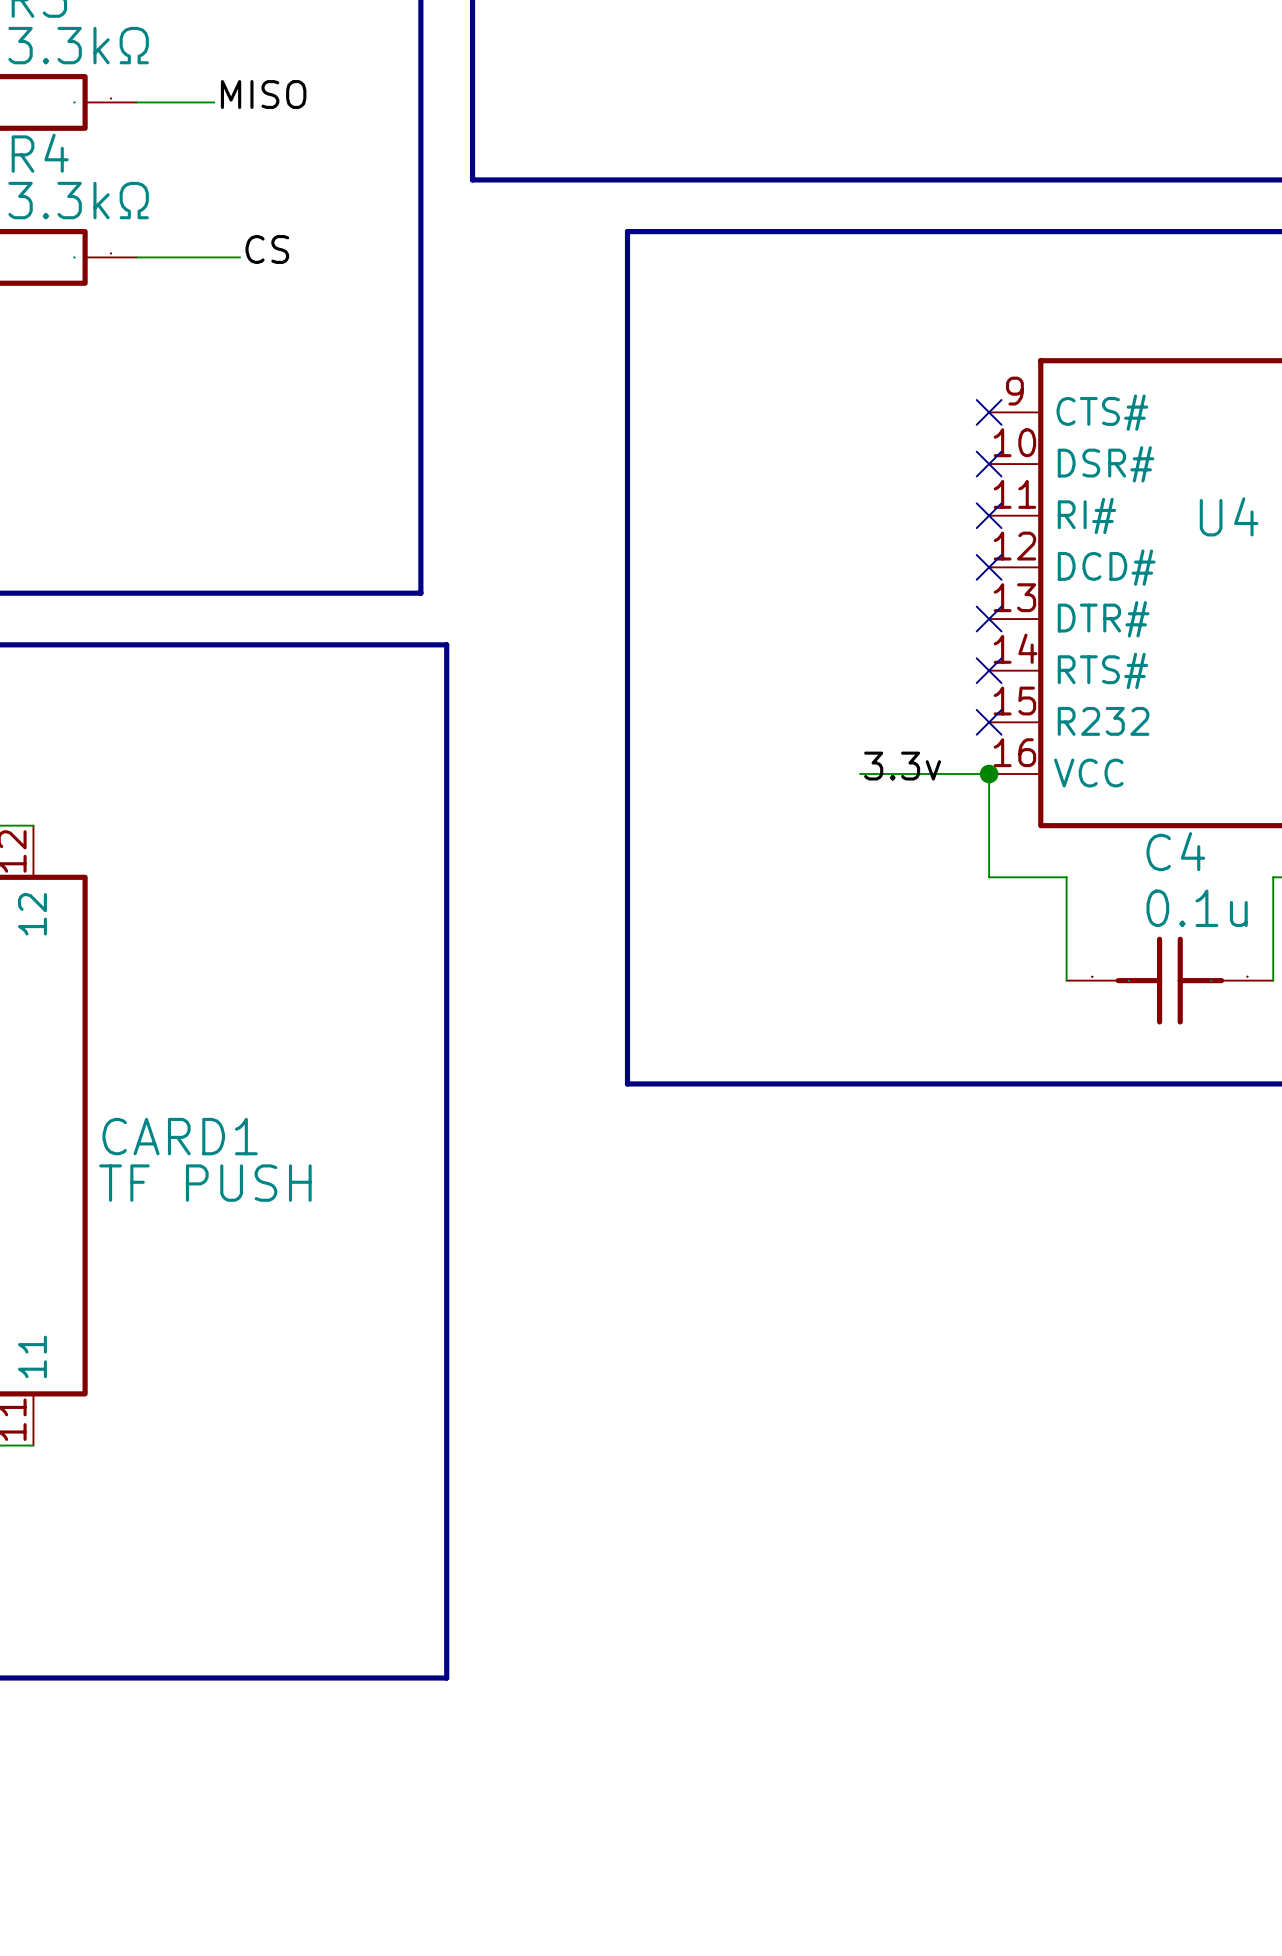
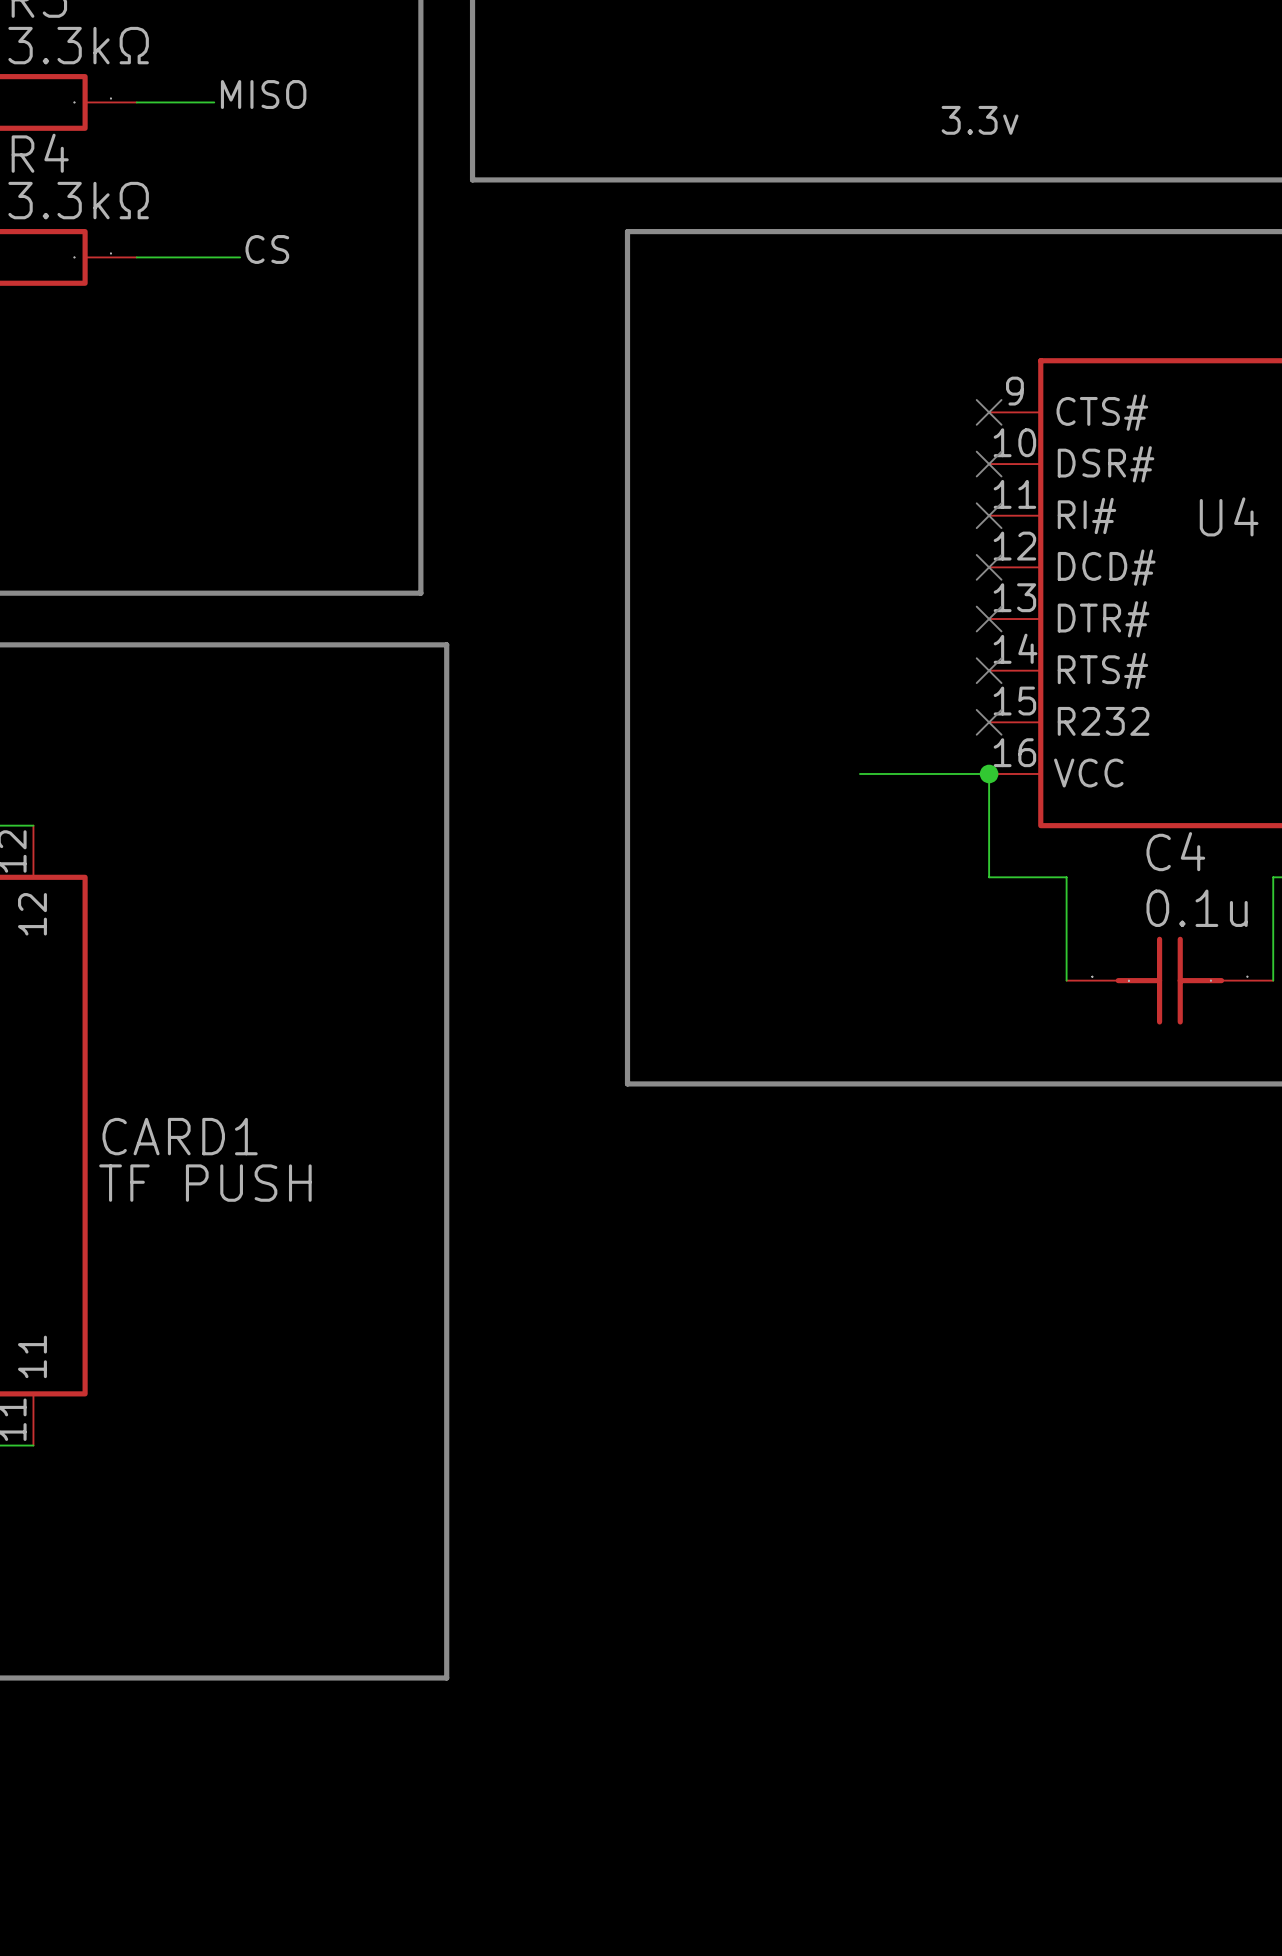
label: none -> 3.3v (980, 120)
label: 3.3v (902, 766) -> none

